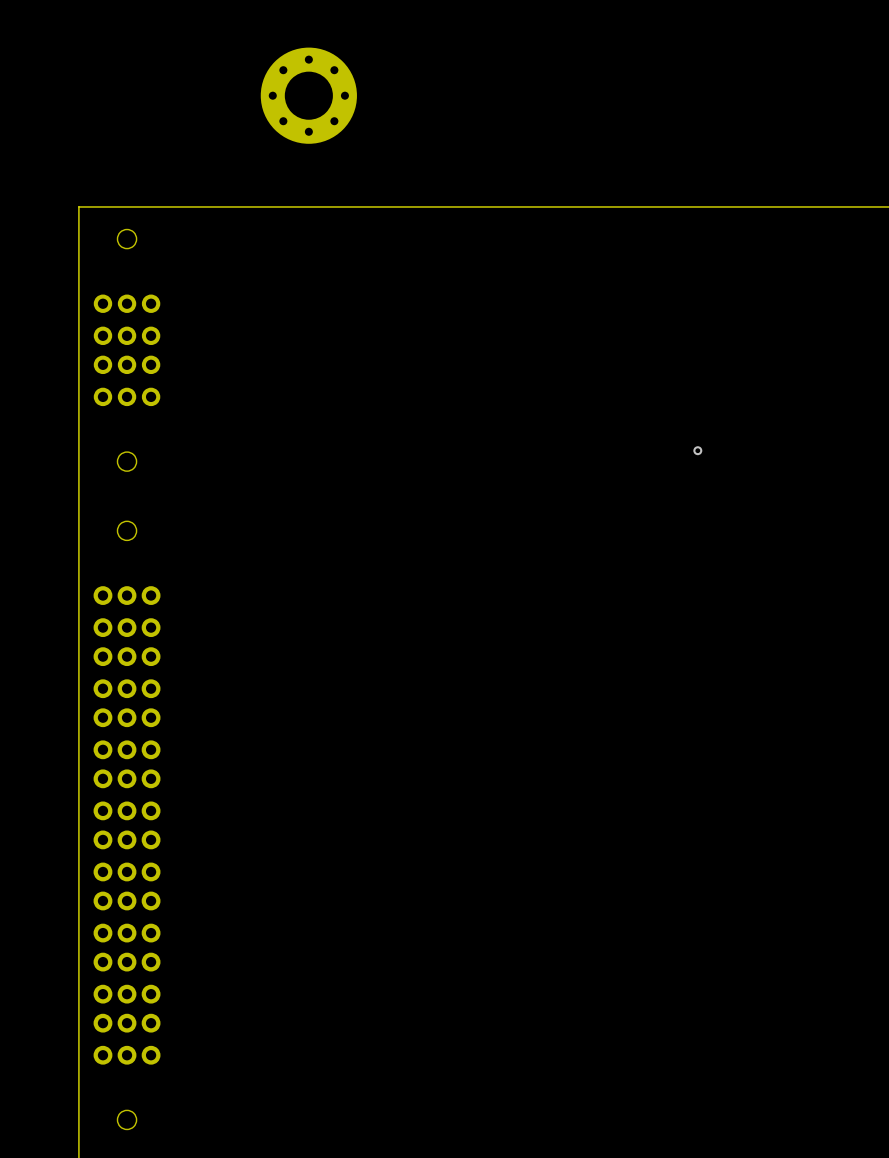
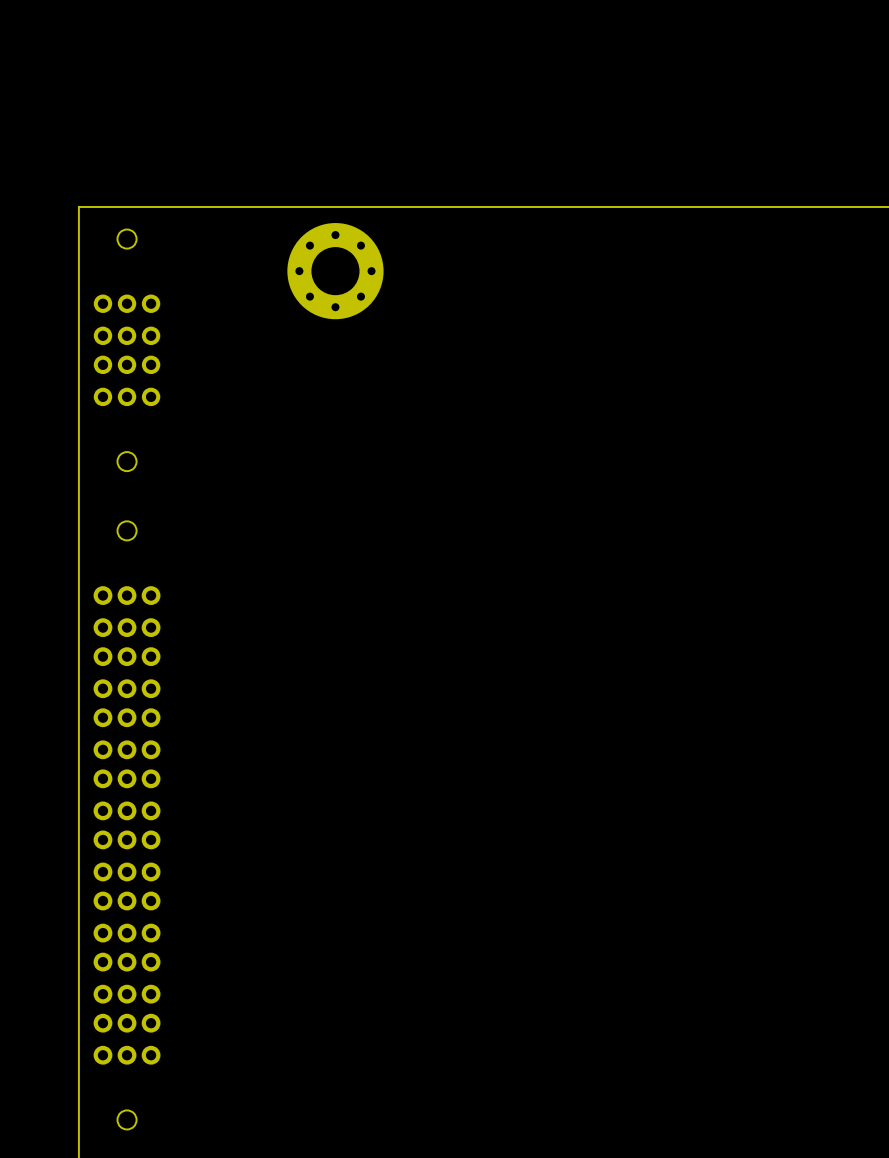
part position: (308, 95) -> (335, 271)
via: (697, 450) -> none

